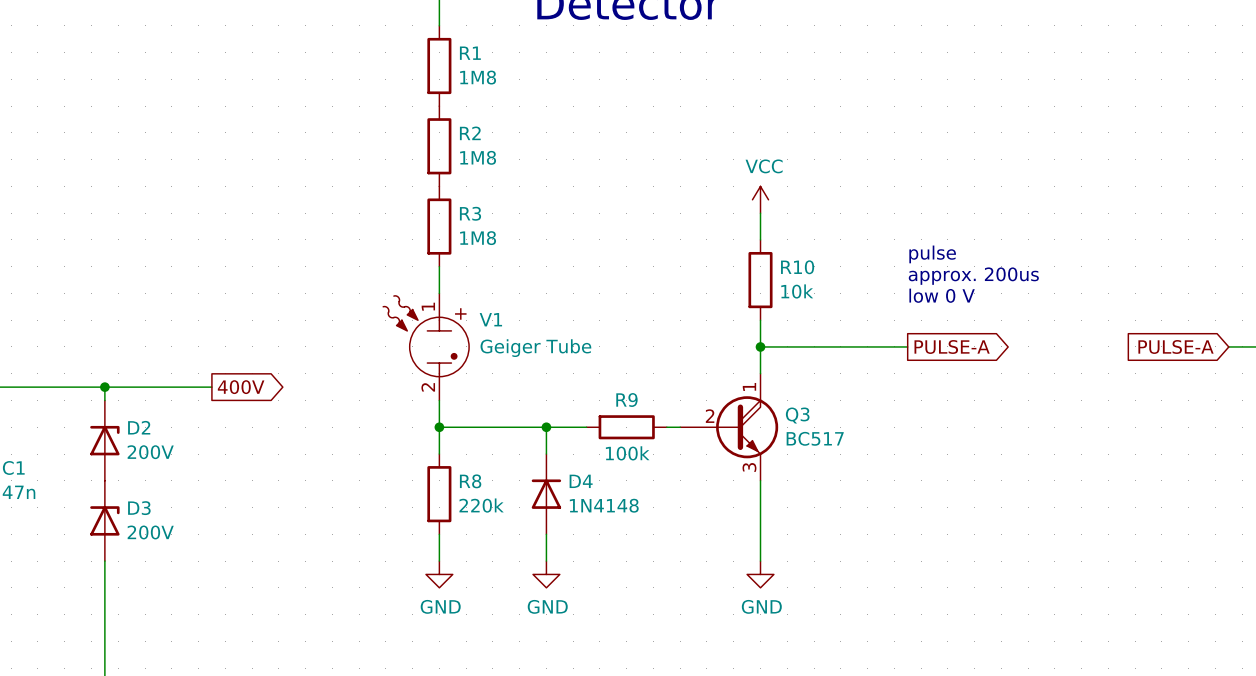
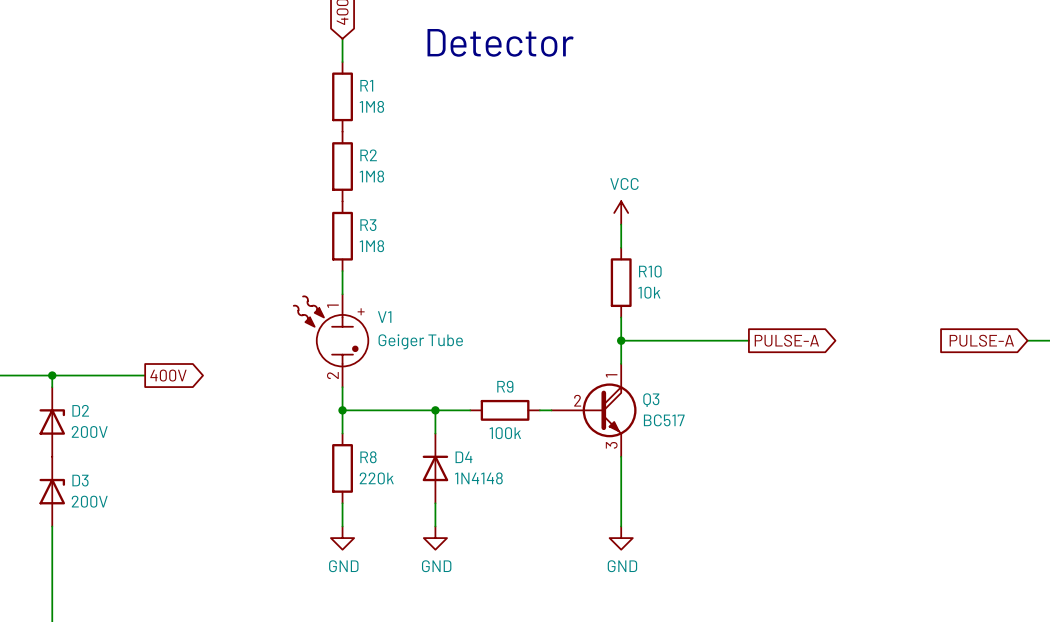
text: pulse (932, 254) -> none
text: approx. 200us (973, 276) -> none
text: low 0 V (942, 295) -> none

